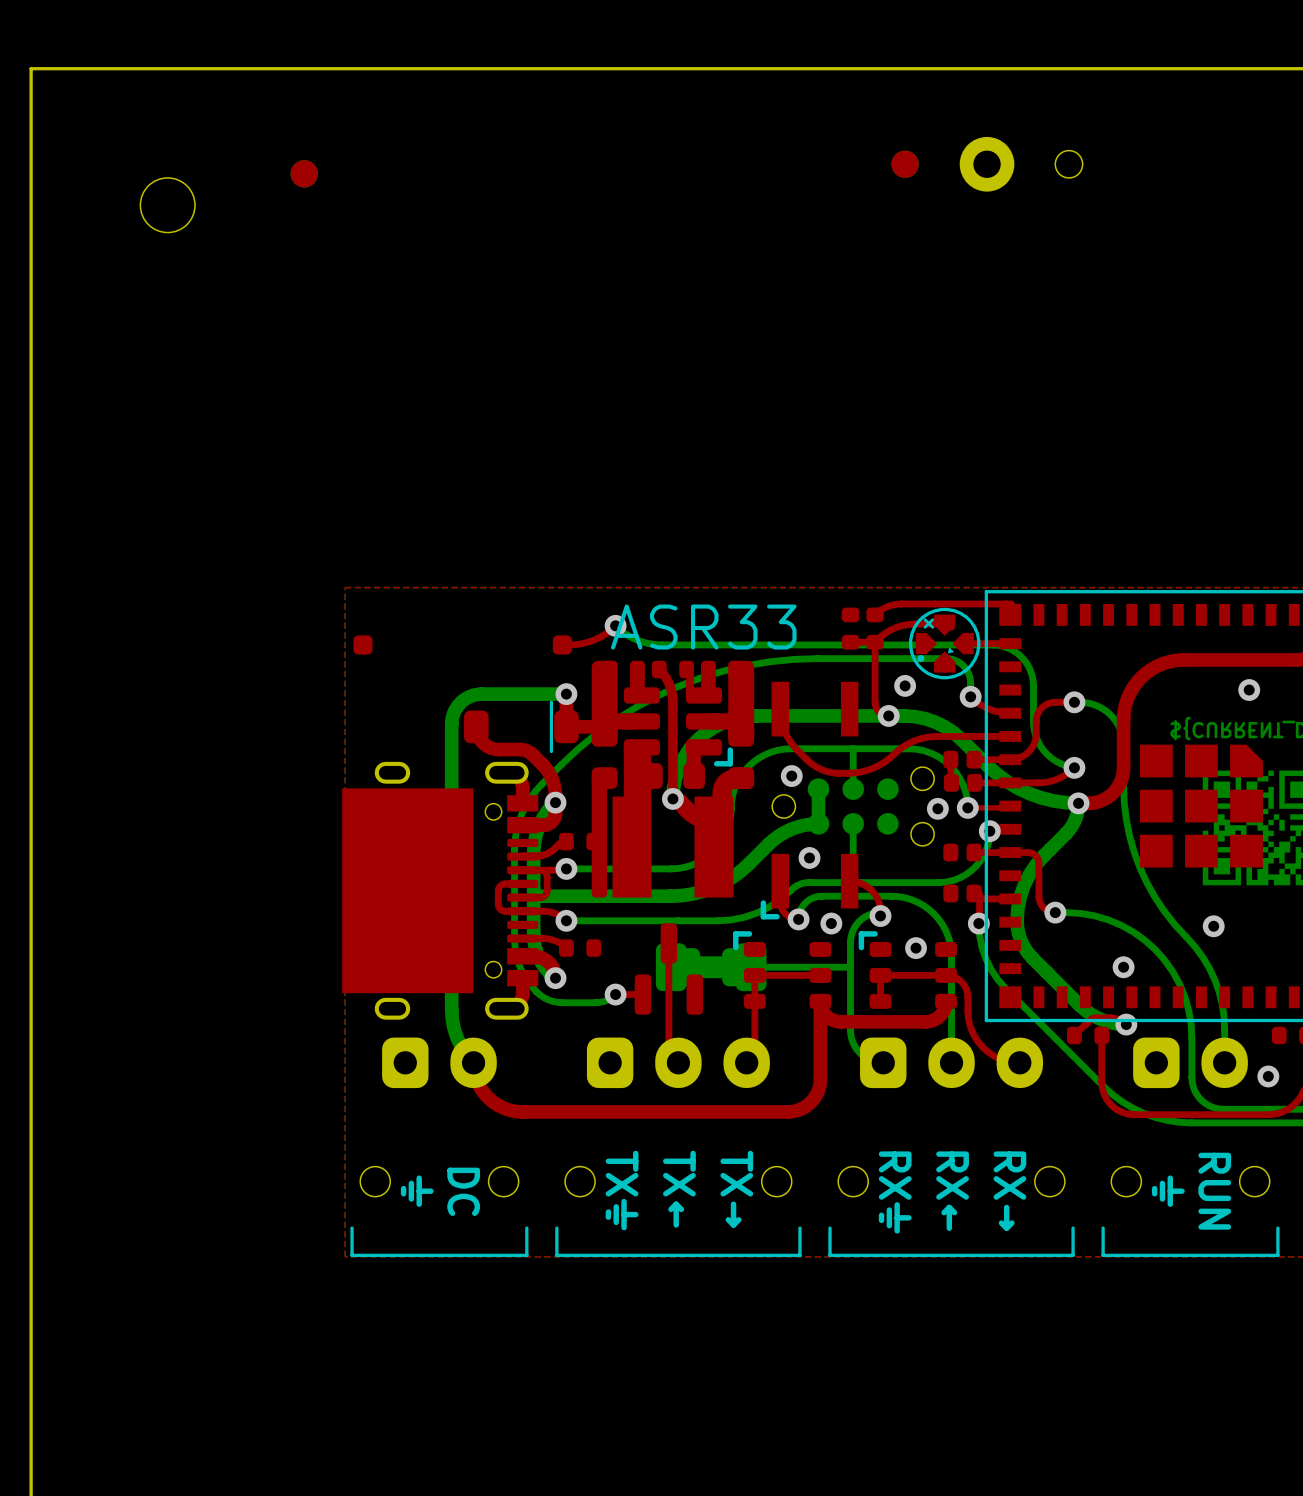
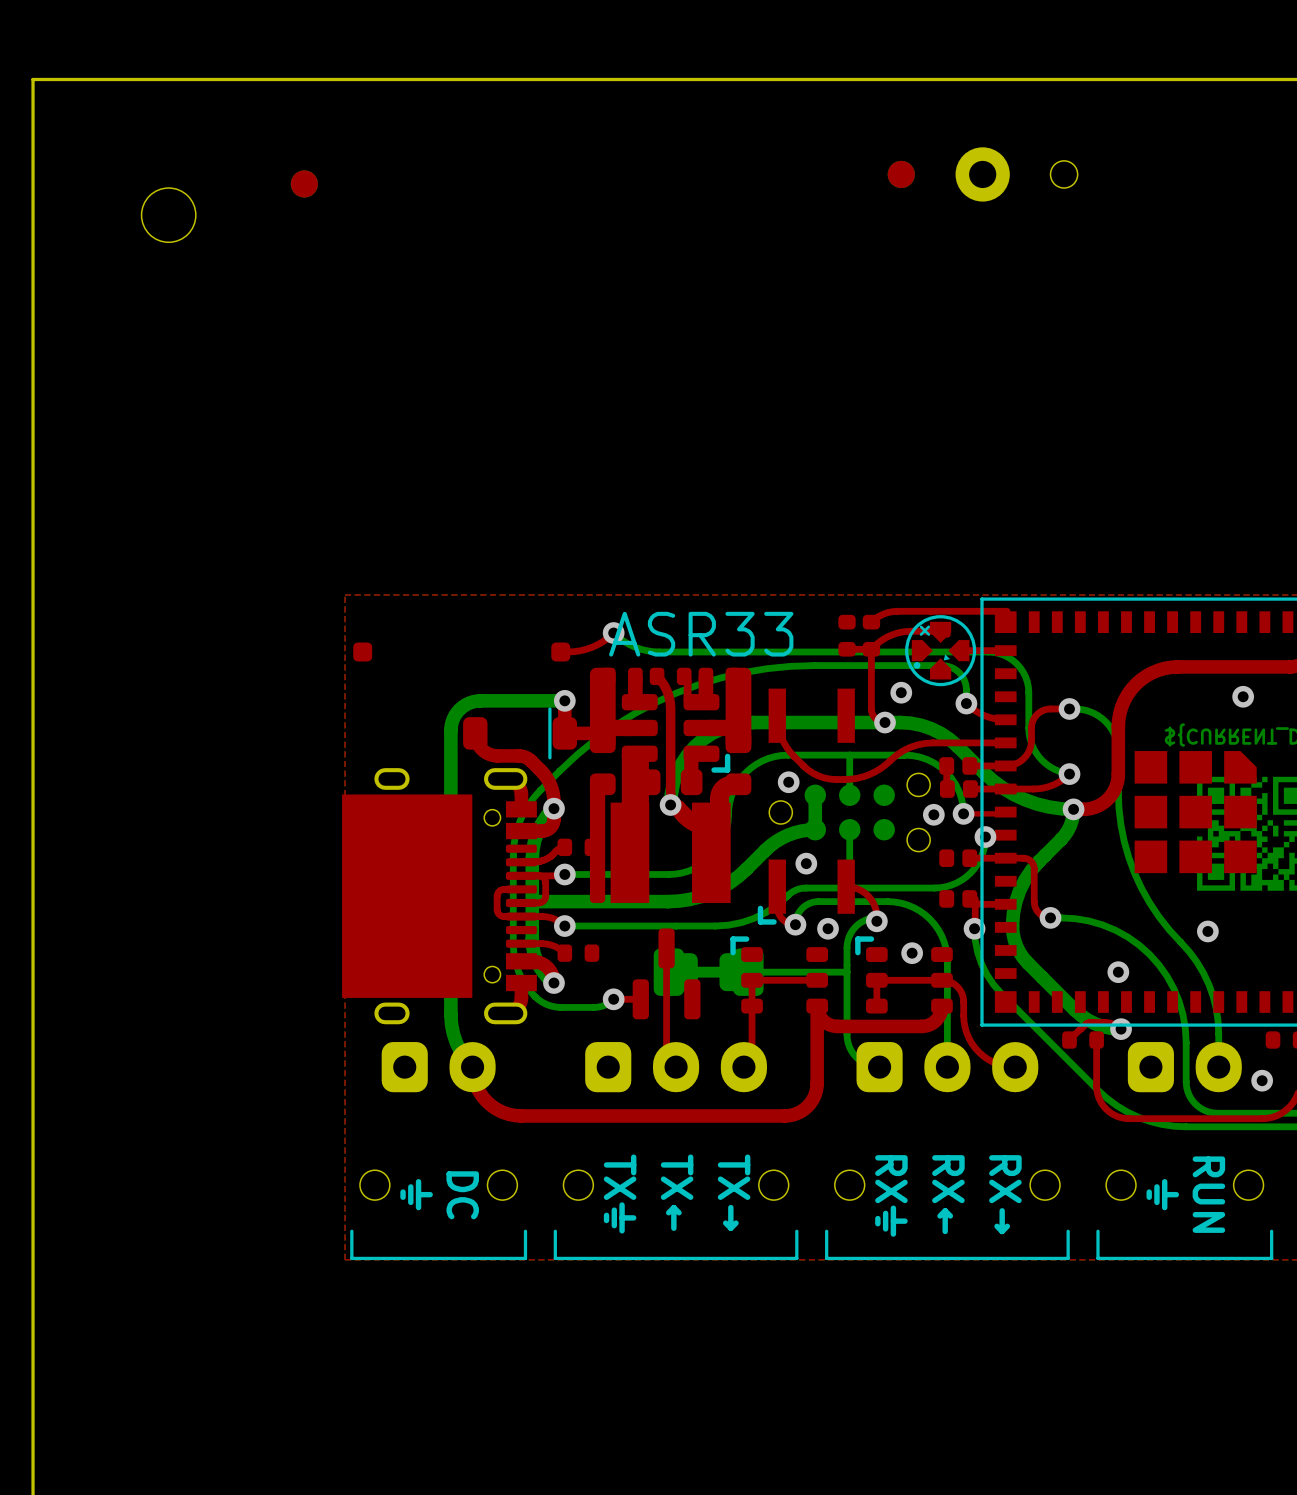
part footprint: [655, 943, 767, 992] -> [653, 948, 764, 996]

